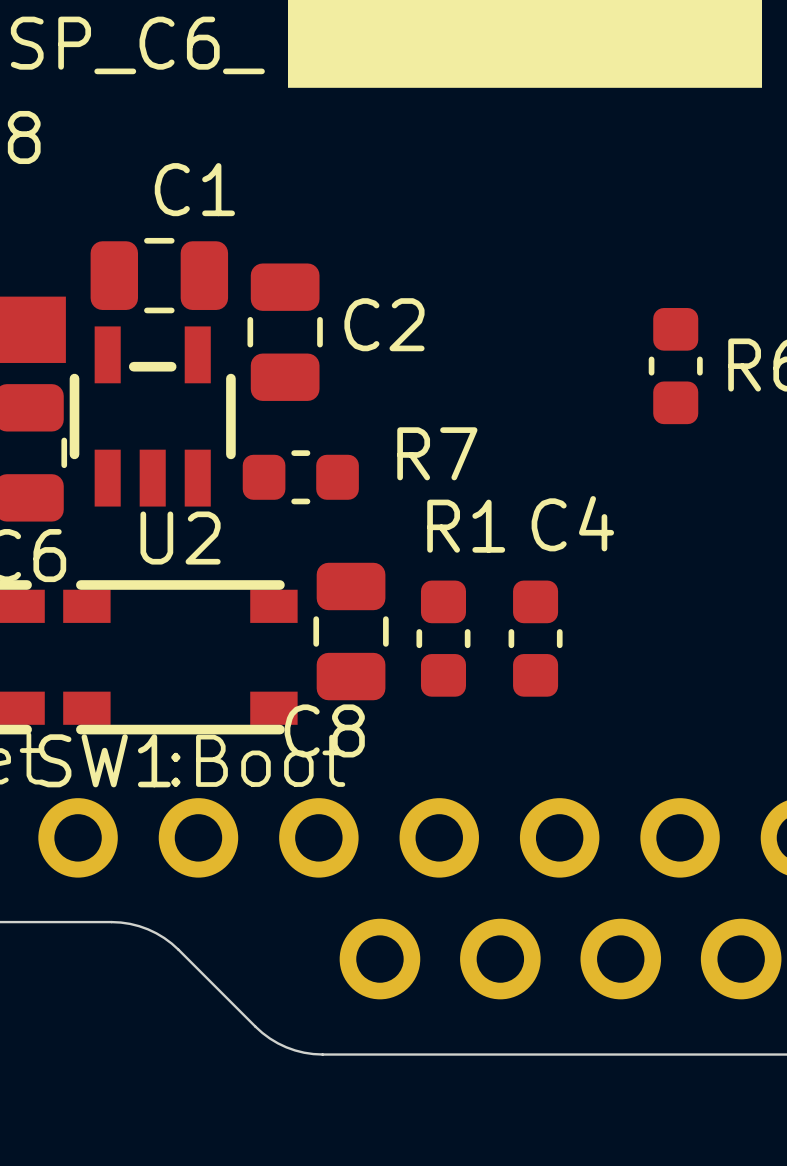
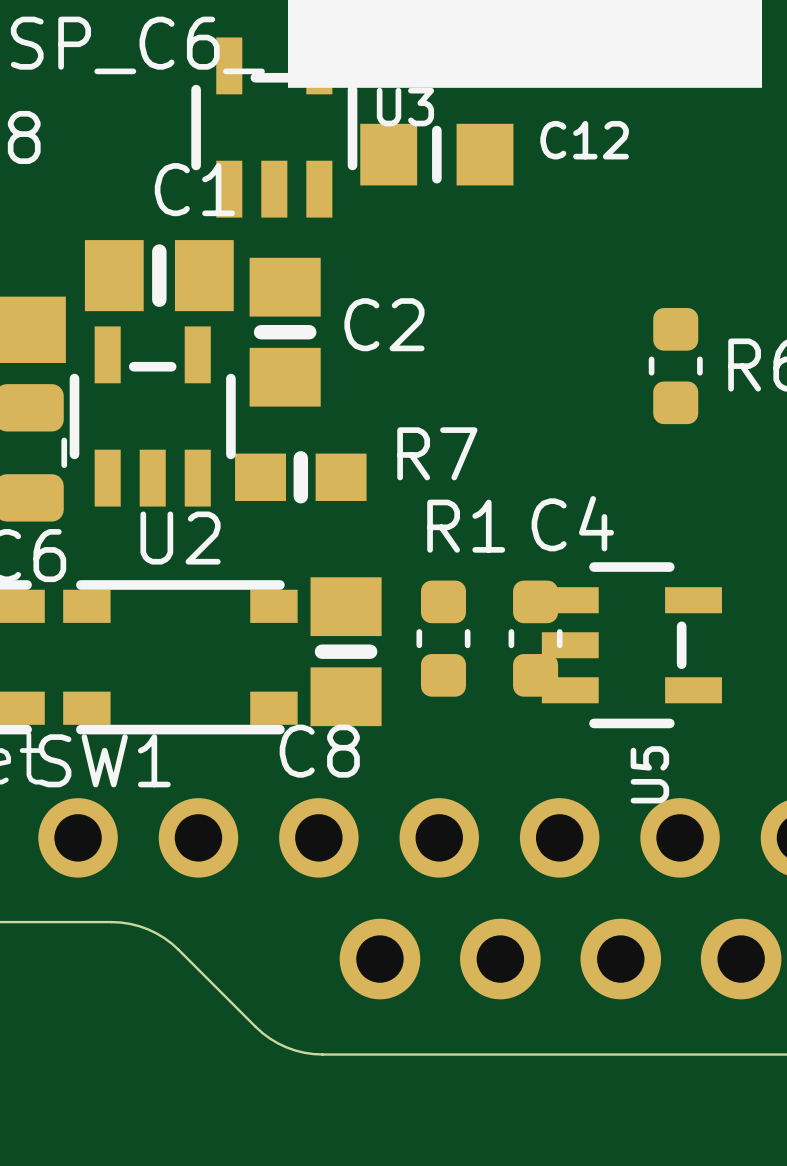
U3: none -> (274, 127)
C12: none -> (436, 154)
C1 footprint: [90, 237, 229, 314] -> [84, 240, 234, 312]
C2 footprint: [247, 263, 323, 401] -> [249, 257, 321, 407]
R7 footprint: [242, 450, 359, 505] -> [235, 451, 367, 504]
C8 footprint: [313, 562, 389, 701] -> [310, 577, 382, 727]
U5: none -> (631, 645)
C8 name position: C8 (324, 730) -> C8 (319, 751)
text: :Boot (258, 760) -> none

